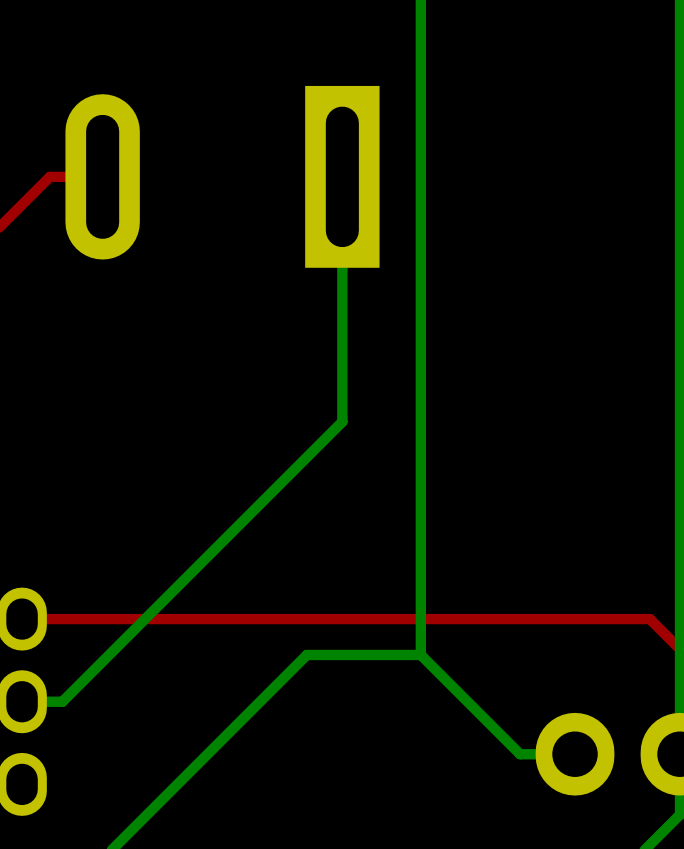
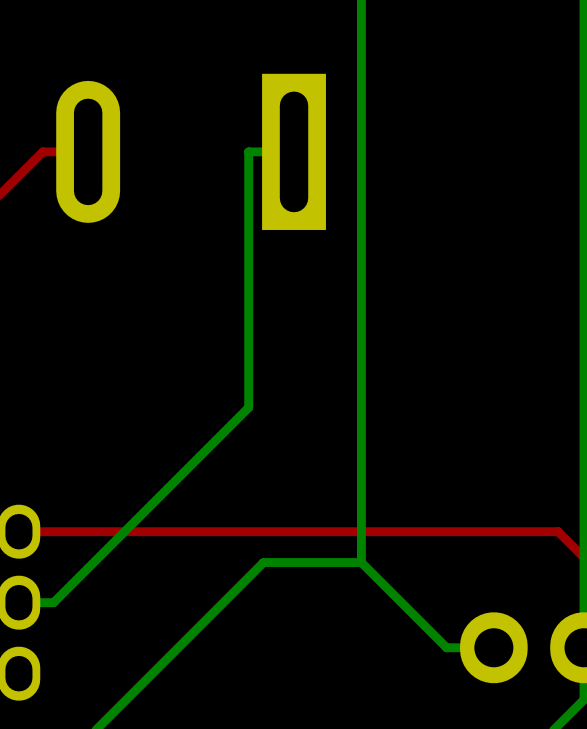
bottom track: (342, 176) (342, 421) (289, 474) -> (294, 151) (248, 151) (248, 407)

